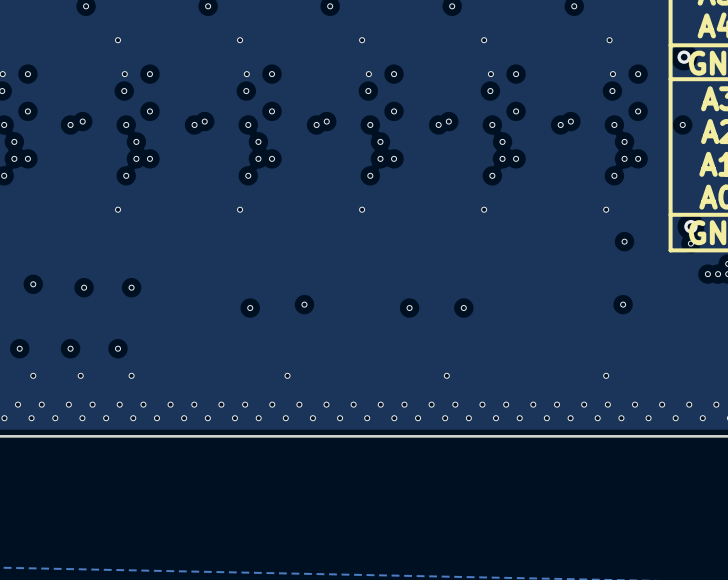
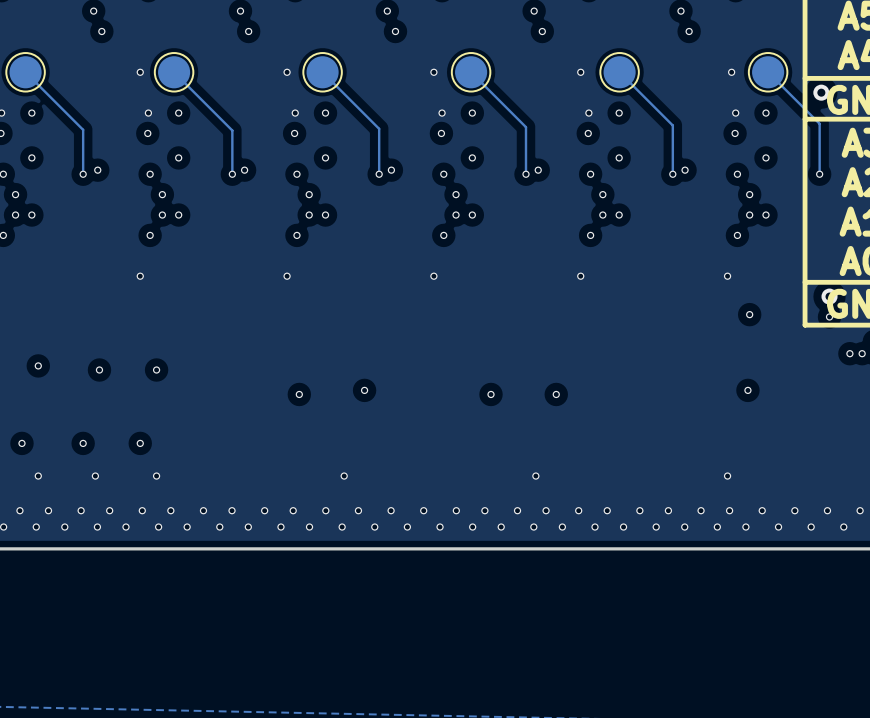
track: none -> (25, 72) (83, 129) (83, 174)
part: none -> (25, 72)
track: none -> (174, 72) (232, 130) (232, 174)
part: none -> (174, 72)
track: none -> (322, 72) (379, 128) (379, 174)
part: none -> (322, 72)
track: none -> (471, 72) (525, 127) (525, 174)
part: none -> (471, 72)
track: none -> (619, 72) (672, 125) (672, 174)
part: none -> (619, 72)
track: none -> (768, 72) (819, 123) (819, 174)
part: none -> (768, 72)

